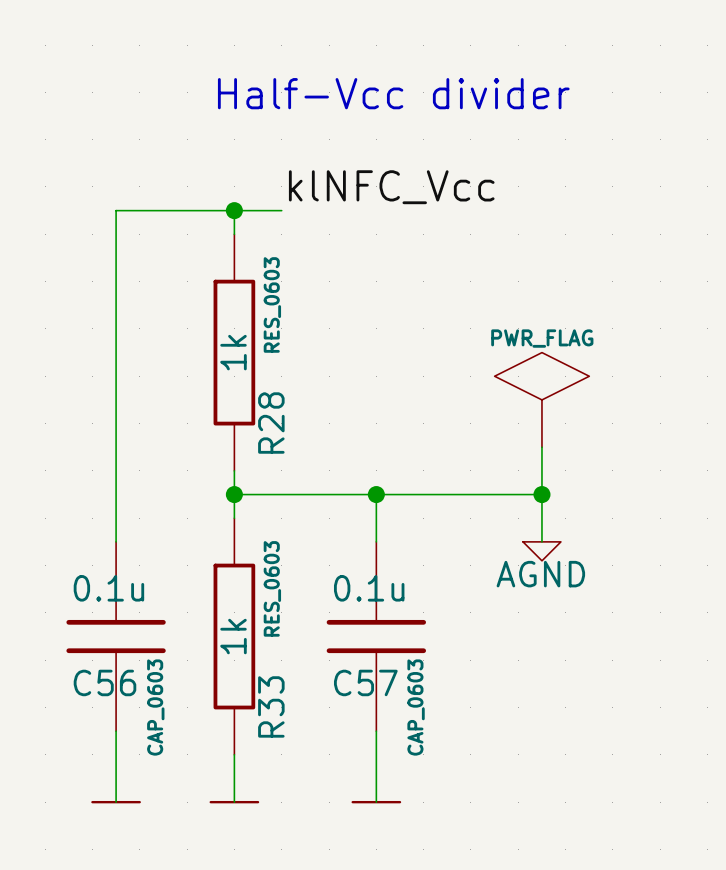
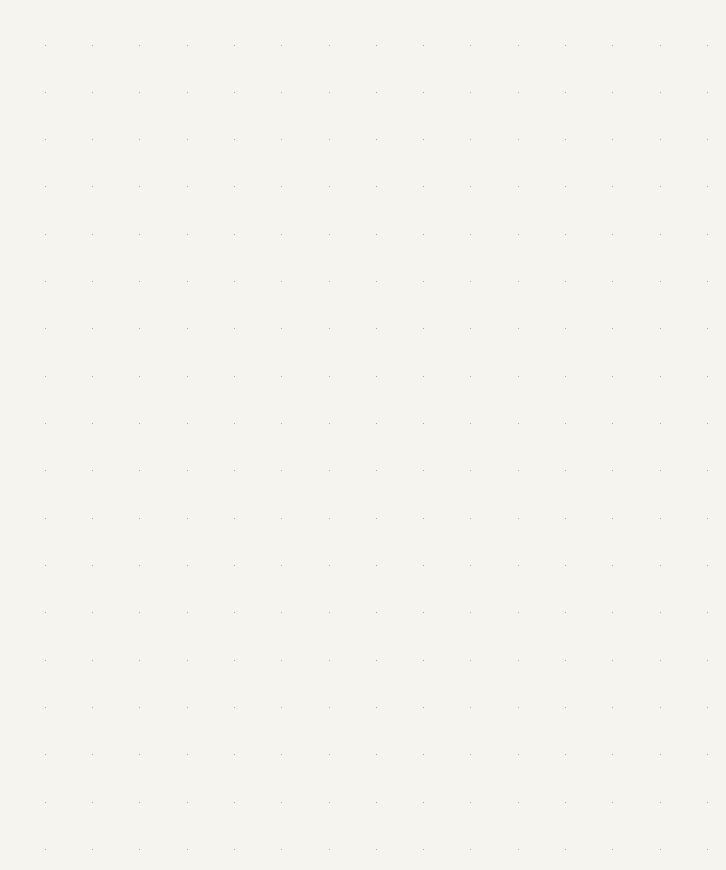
text: Half-Vcc divider (393, 93) -> none
label: klNFC_Vcc (391, 187) -> none
wire: (234, 210) (234, 234) -> none
junction: (234, 210) -> none
wire: (281, 210) (116, 210) (116, 541) -> none
R28: 1k (234, 352) -> none
power symbol: PWR_FLAG (541, 399) -> none
wire: (541, 447) (541, 541) -> none
wire: (234, 470) (234, 518) -> none
wire: (234, 494) (541, 494) -> none
junction: (234, 494) -> none
wire: (376, 494) (376, 541) -> none
junction: (376, 494) -> none
junction: (541, 494) -> none
power symbol: AGND (541, 551) -> none
C56: 0.1u (116, 636) -> none
R33: 1k (234, 636) -> none
C57: 0.1u (376, 636) -> none
wire: (116, 731) (116, 802) -> none
wire: (376, 731) (376, 802) -> none
wire: (234, 754) (234, 802) -> none
power symbol: (116, 802) -> none
power symbol: (234, 802) -> none
power symbol: (376, 802) -> none

